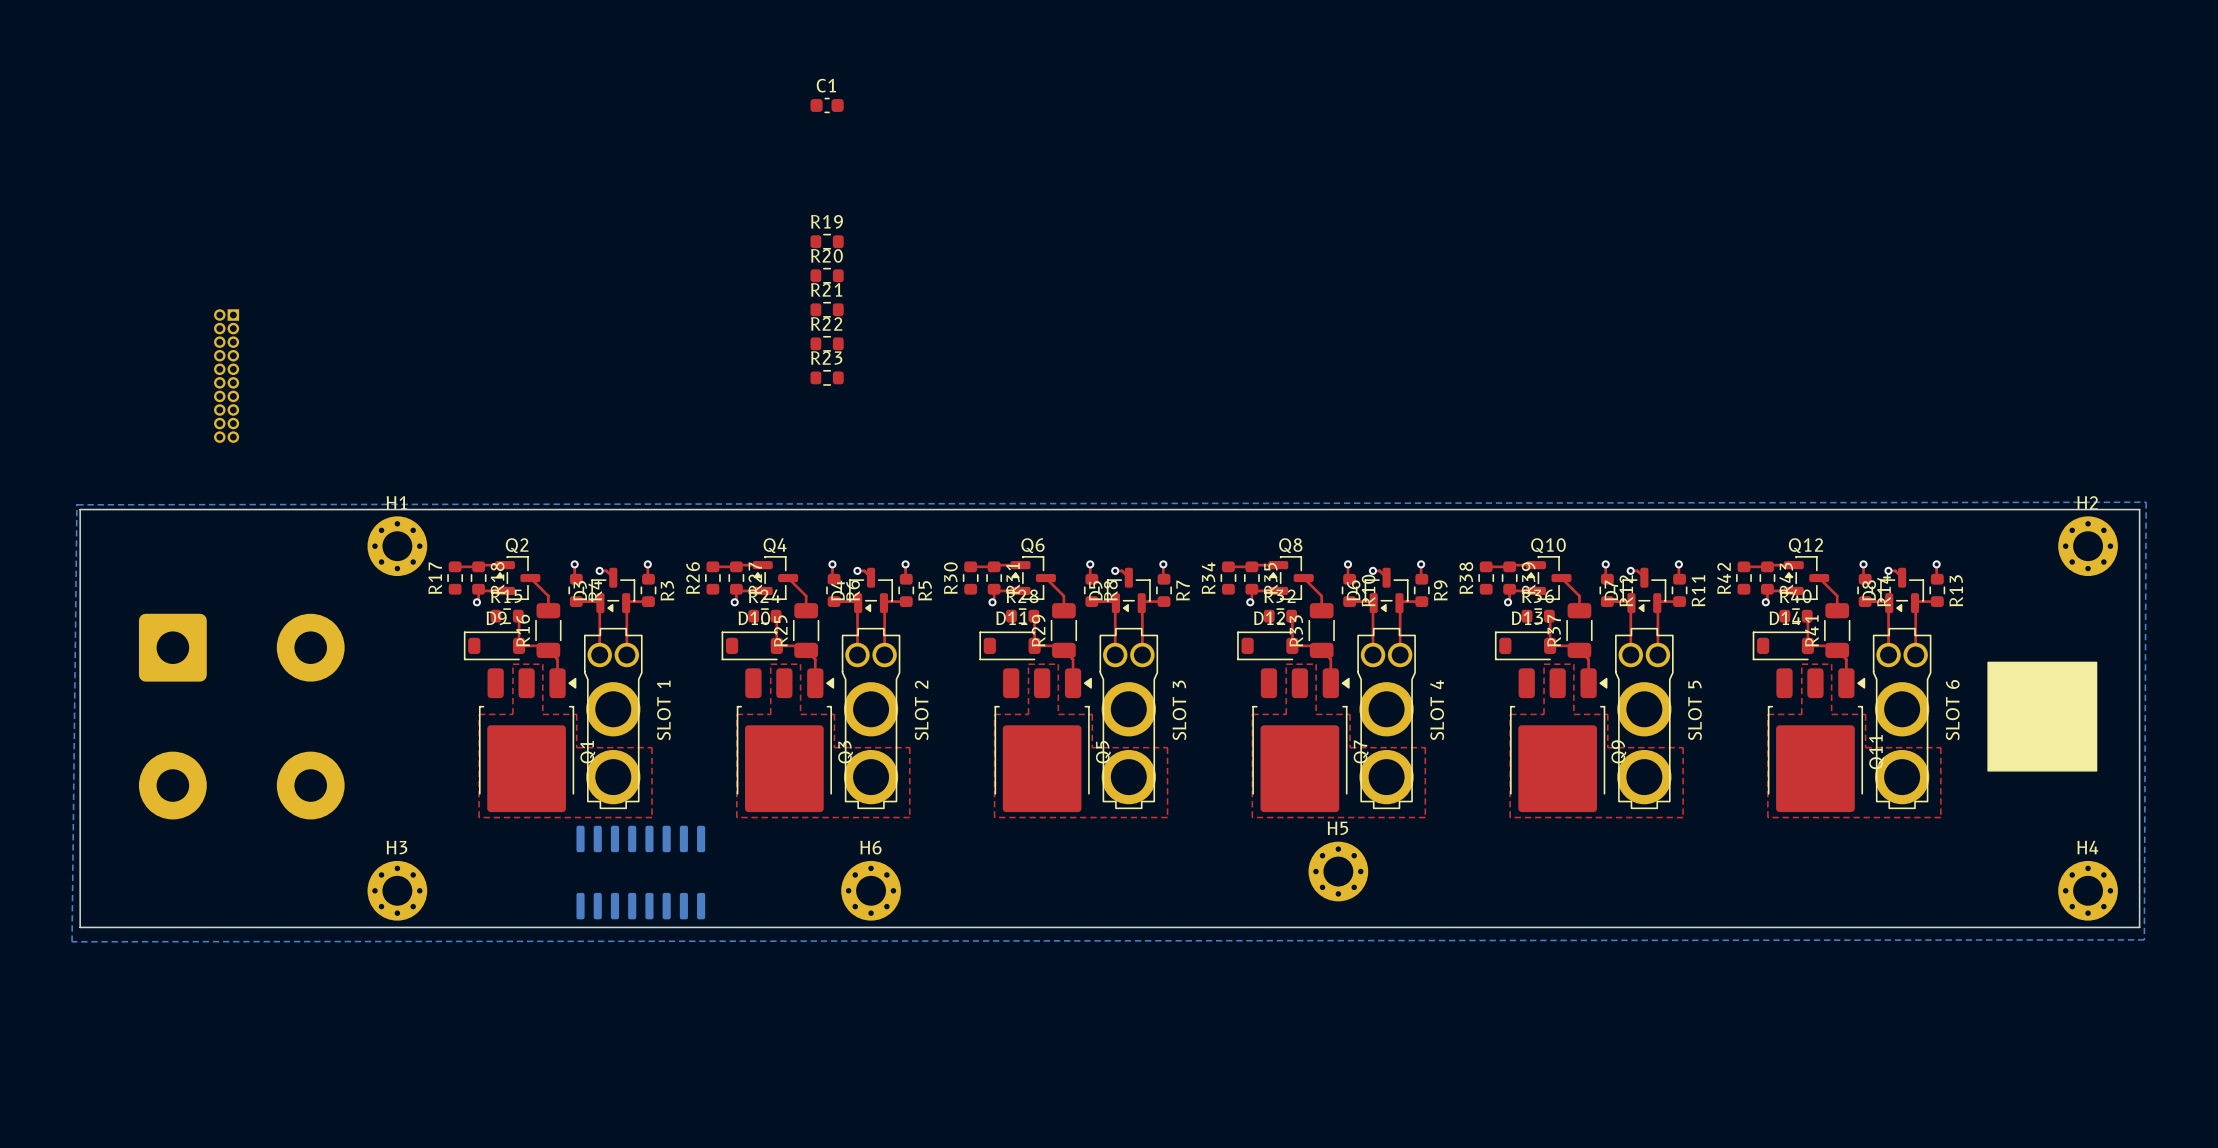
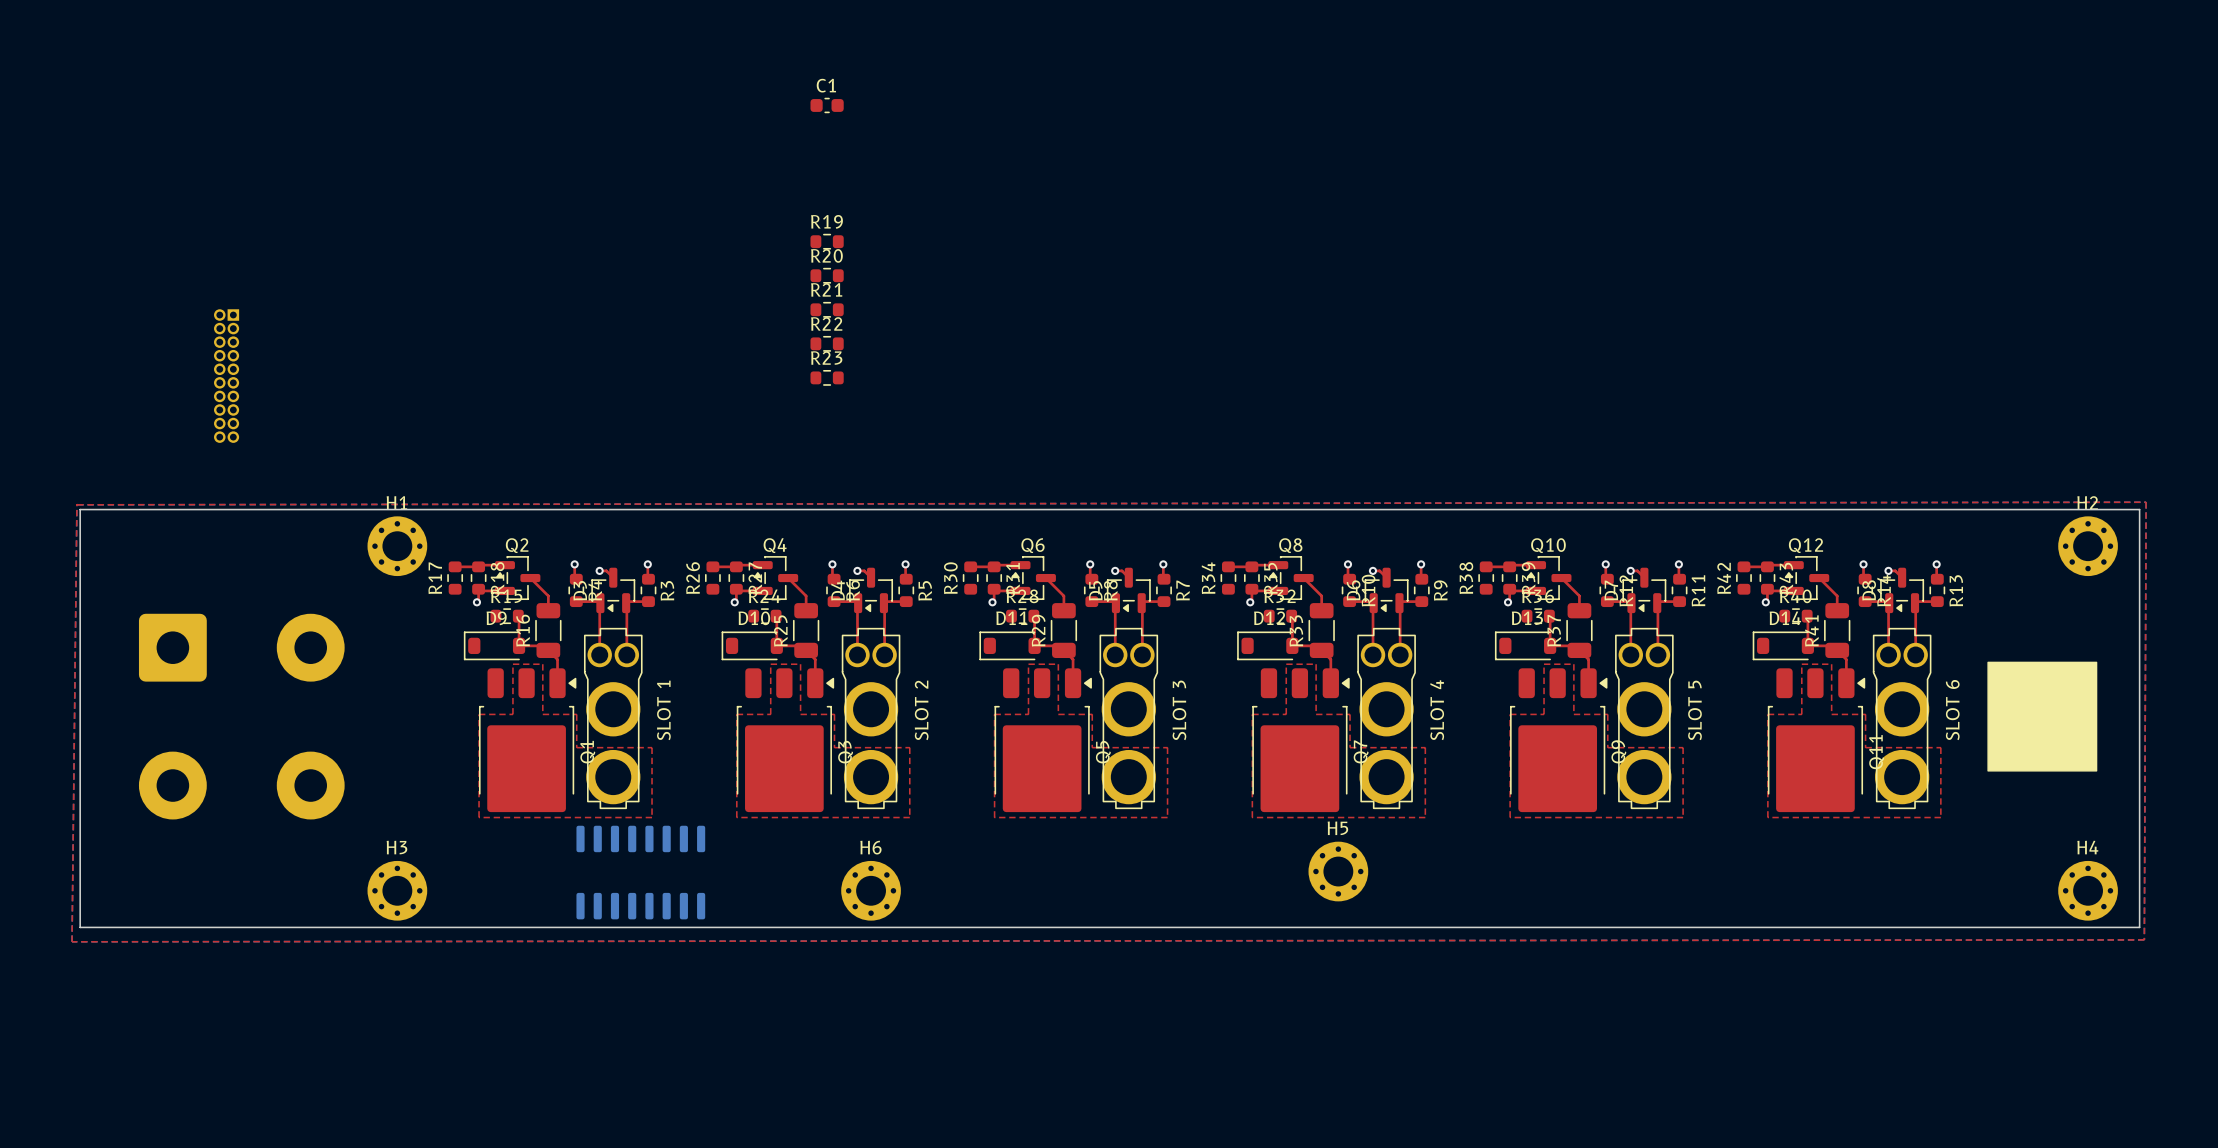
top zone outline: none -> (2146, 502) (76, 504) (72, 941) (2144, 939) (2146, 502)

